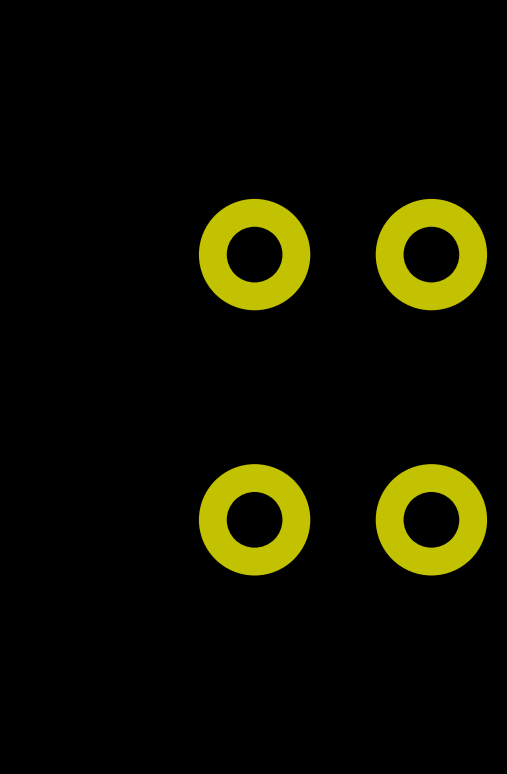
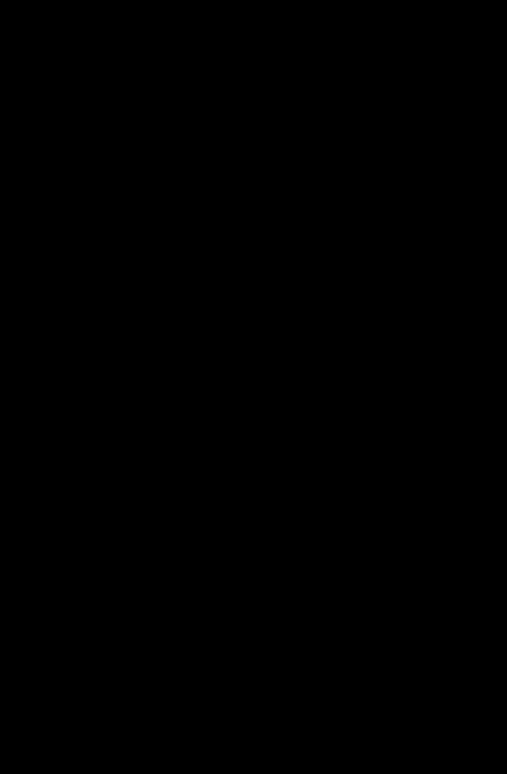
part: (343, 254) -> none
part: (343, 519) -> none

